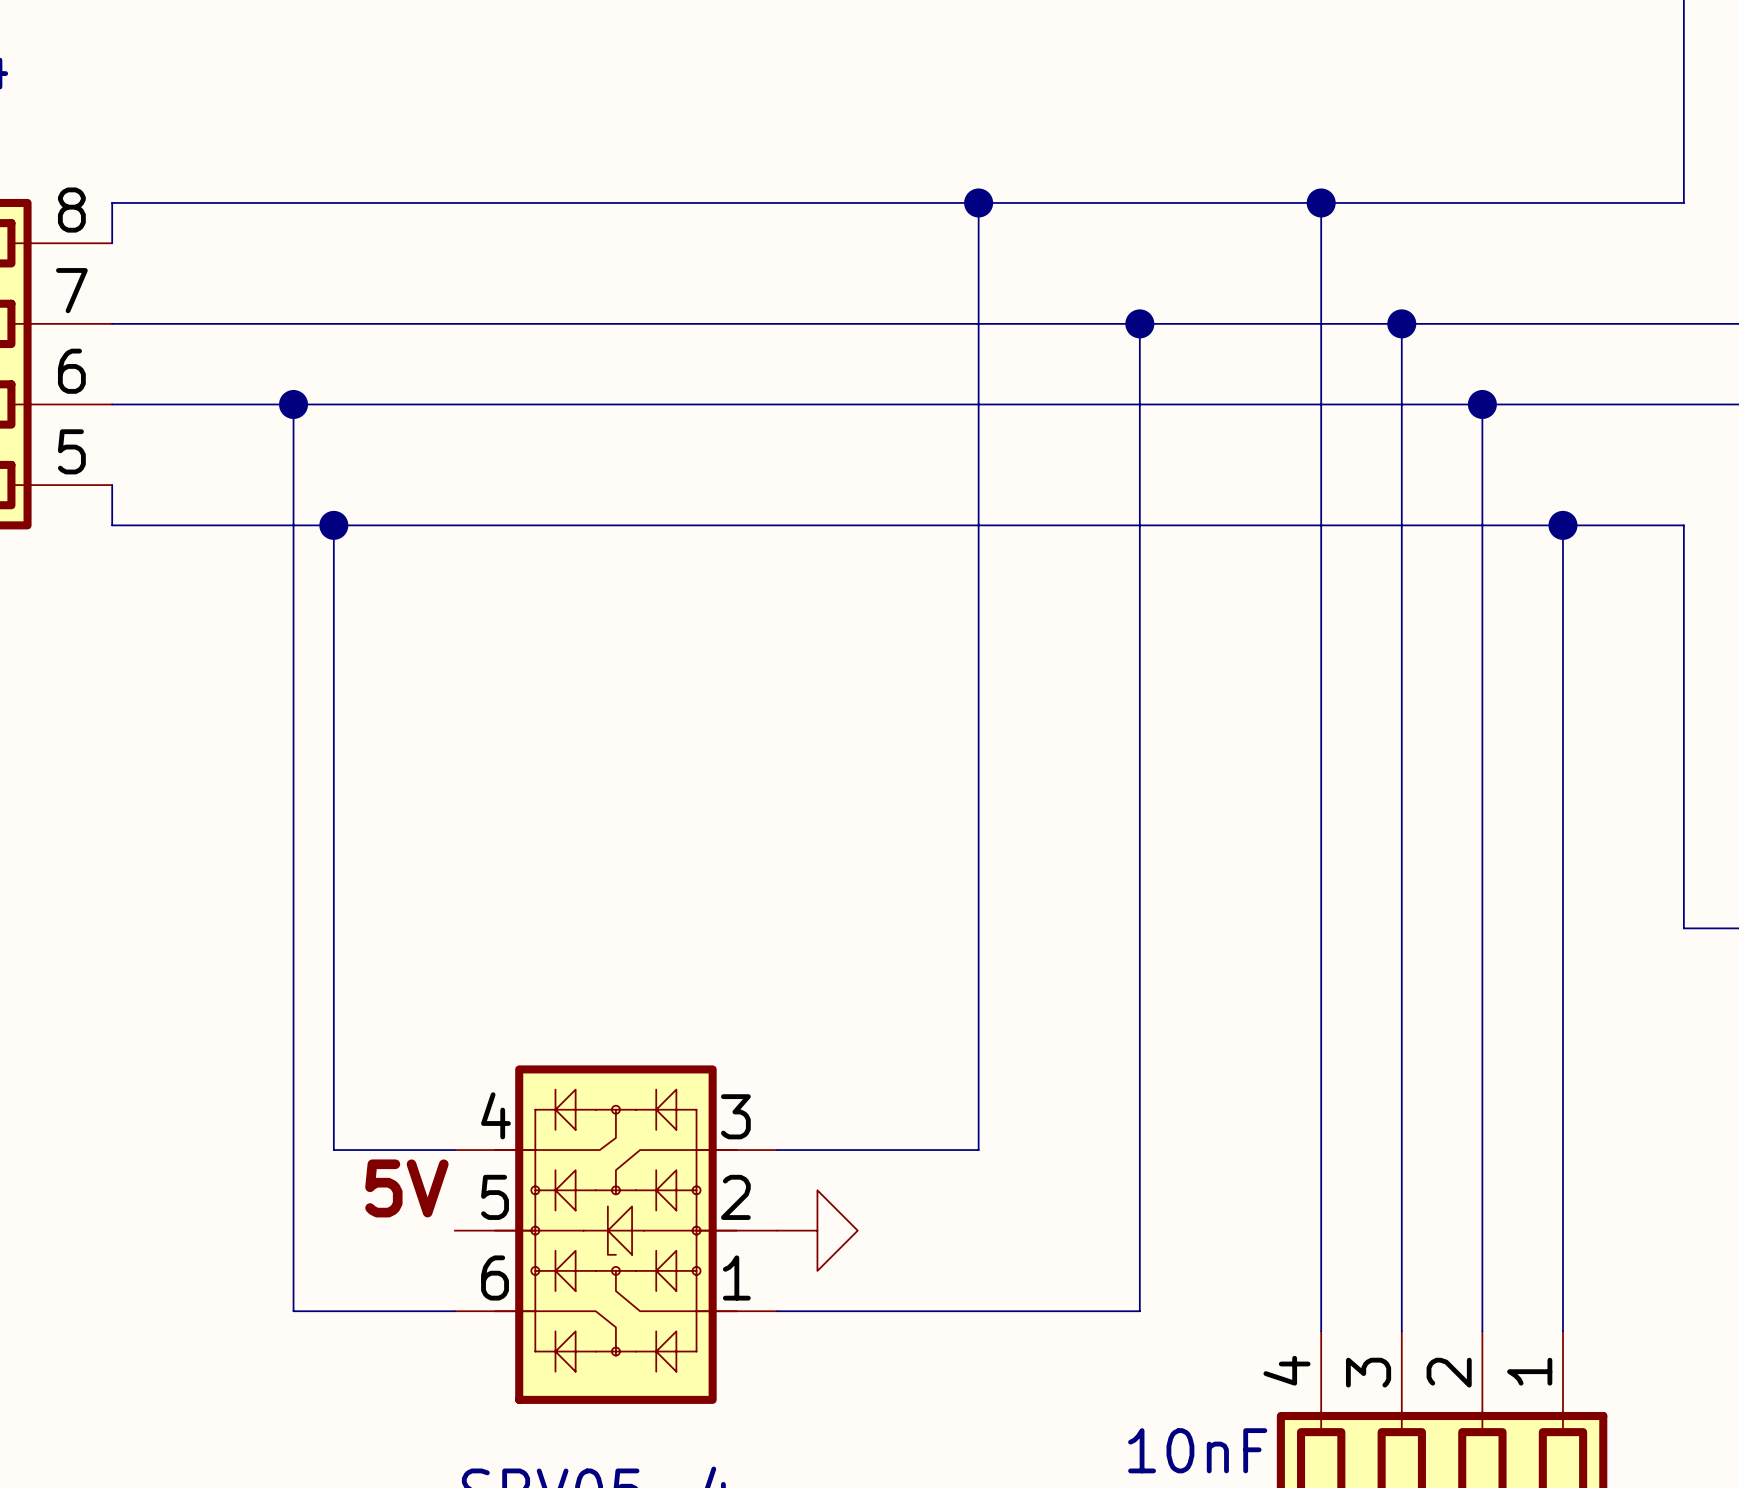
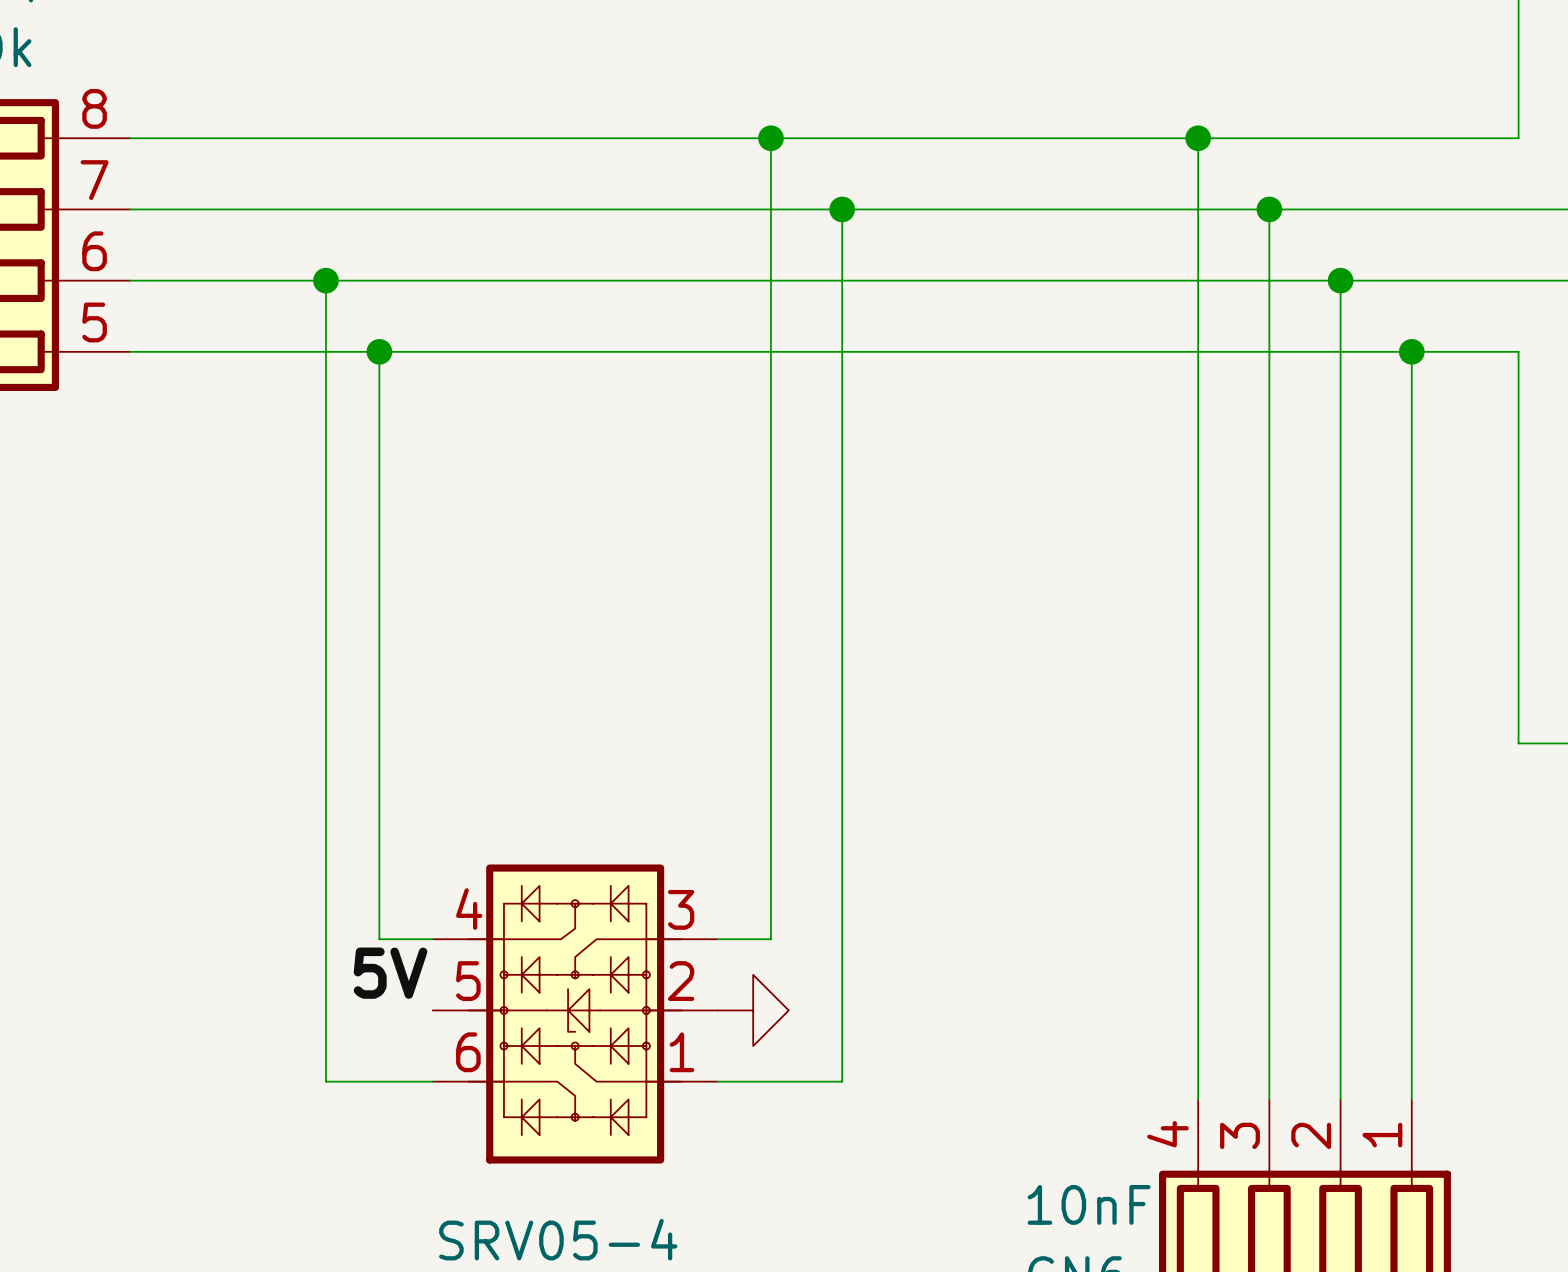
wire: (978, 202) (978, 1150) (837, 1150) -> (770, 138) (770, 939)
junction: (978, 202) -> none
wire: (1321, 202) (1321, 243) -> (1411, 351) (1411, 387)
junction position: (1321, 202) -> (1198, 138)
wire: (1683, 202) (112, 202) (112, 243) -> (1518, 102) (1518, 138) (130, 138)
junction: none -> (770, 138)
junction: none -> (842, 209)
wire: (1139, 323) (1139, 1311) (918, 1311) -> (842, 209) (842, 1081)
junction: (1139, 323) -> none
wire: (293, 404) (293, 1311) (333, 1311) -> none
junction position: (293, 404) -> (325, 280)
wire: none -> (325, 280) (325, 387)
wire: (112, 485) (112, 525) (1683, 525) -> (130, 351) (1518, 351) (1518, 387)
wire: none -> (379, 351) (379, 939)
junction: none -> (379, 351)
junction: (333, 525) -> none
junction position: (1562, 525) -> (1411, 351)
wire: (333, 1150) (394, 1150) -> (325, 939) (325, 1081)

